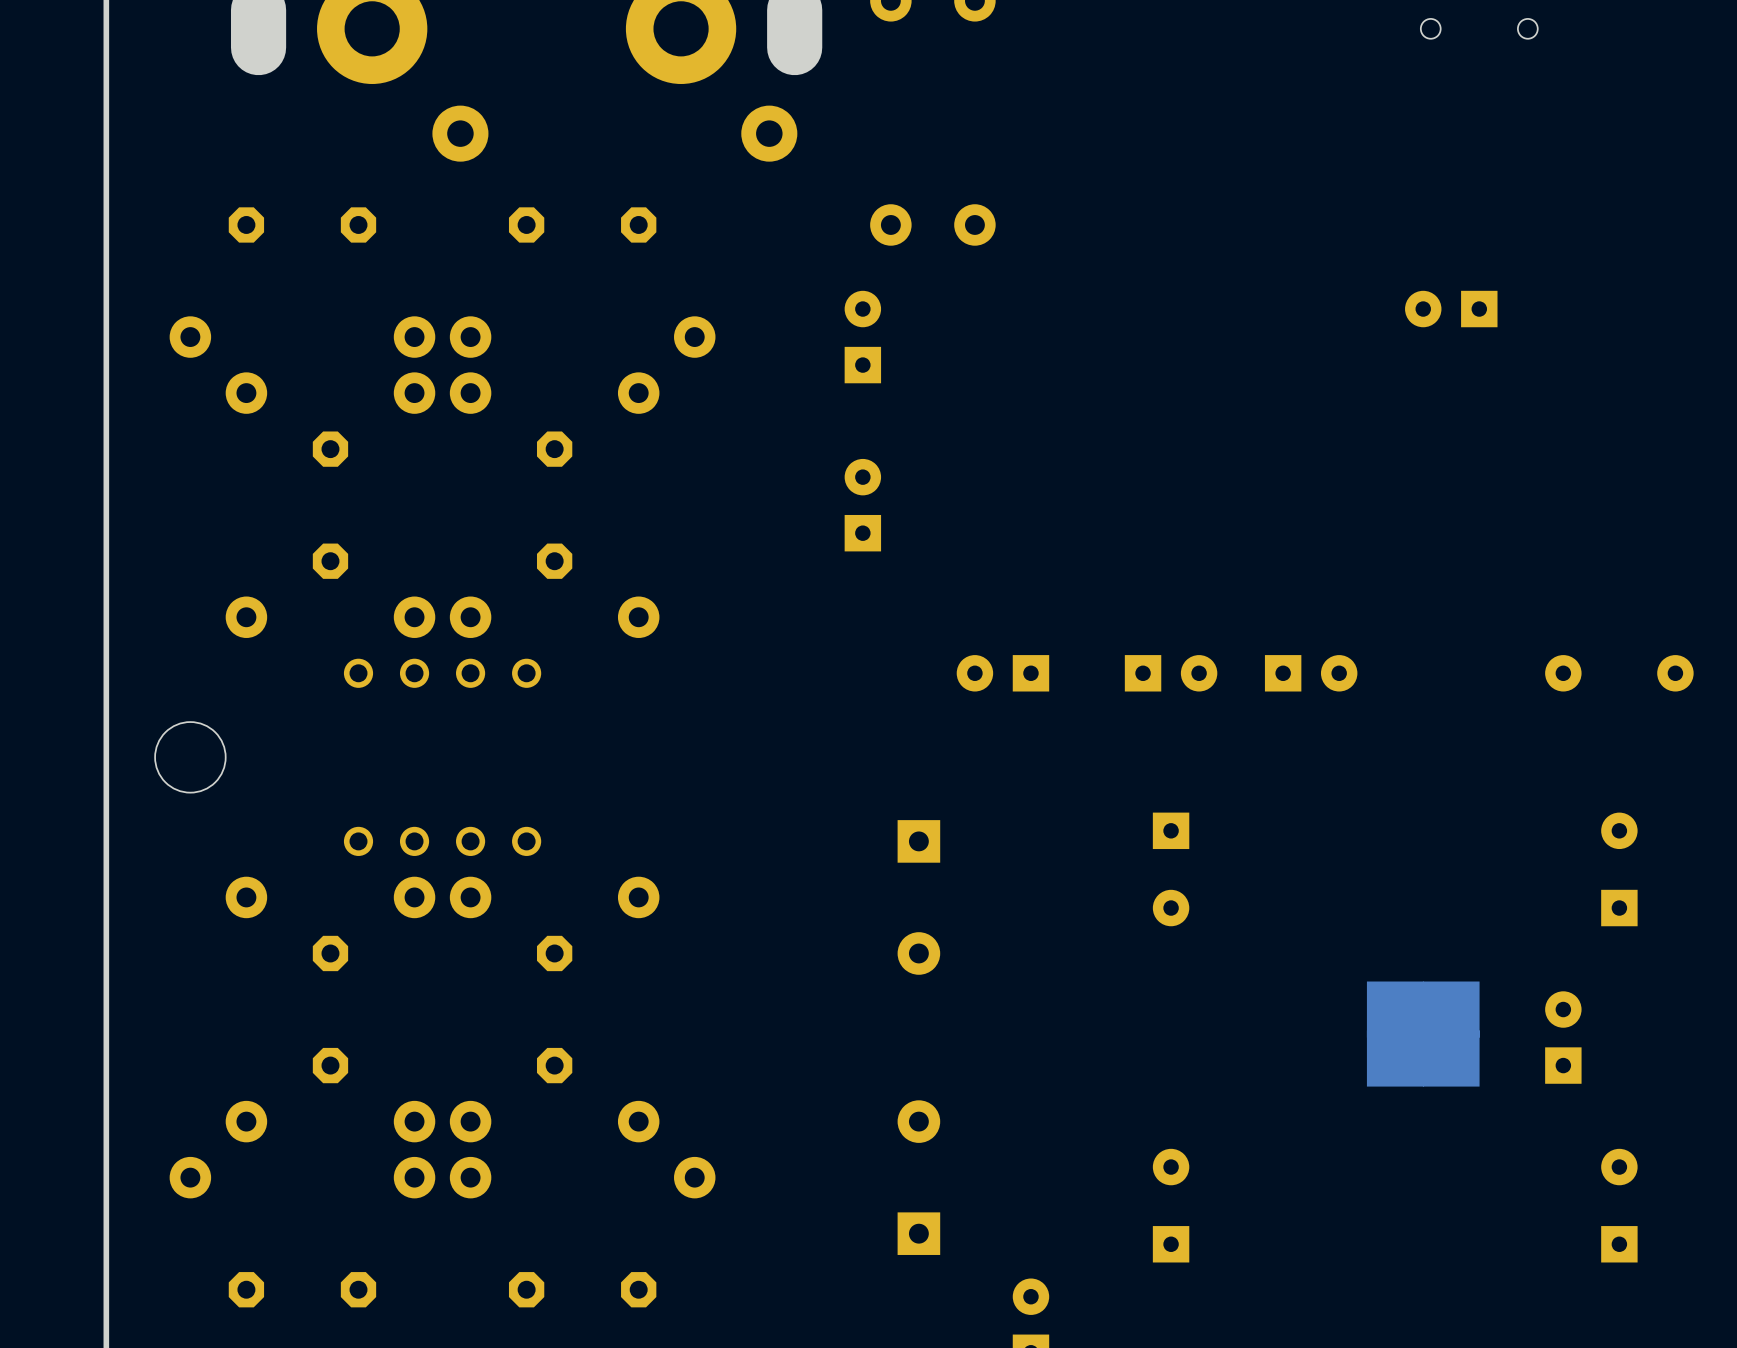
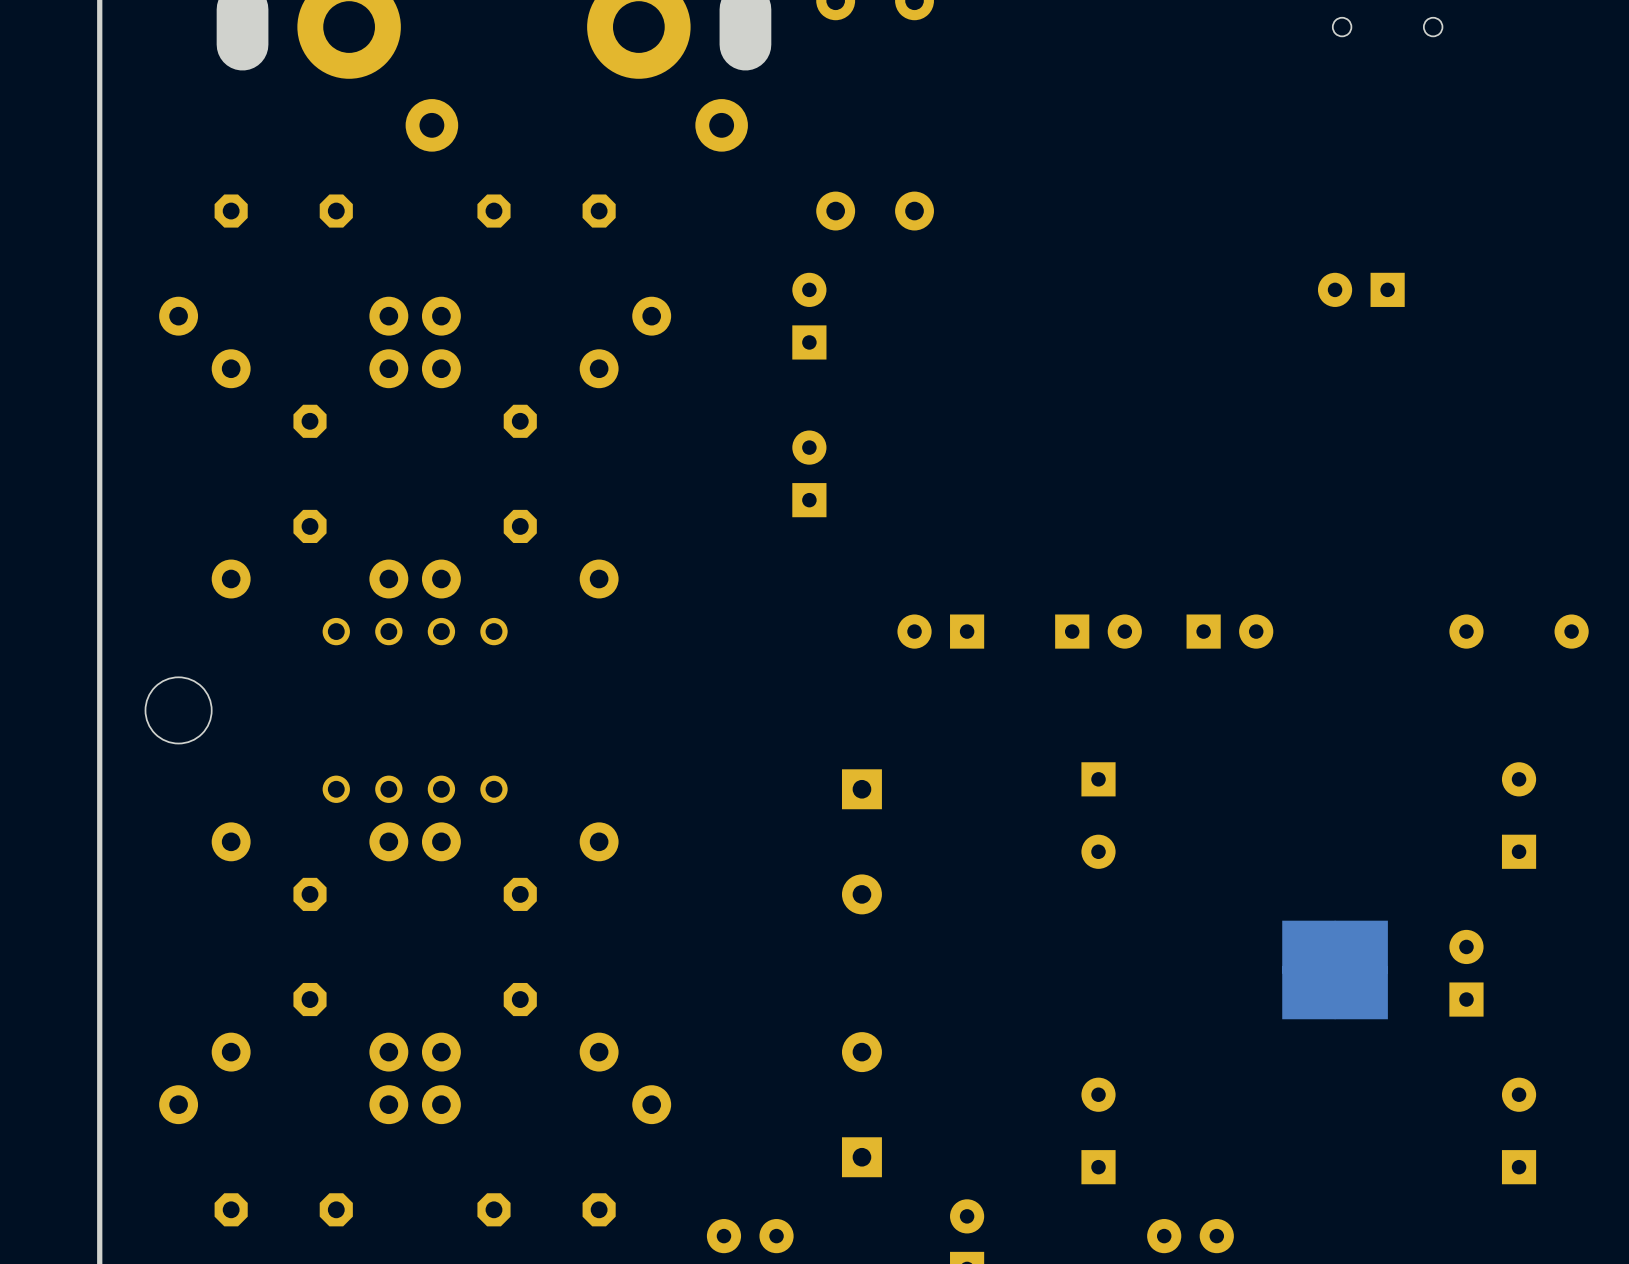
part: none -> (750, 1236)
part: none -> (1190, 1236)

